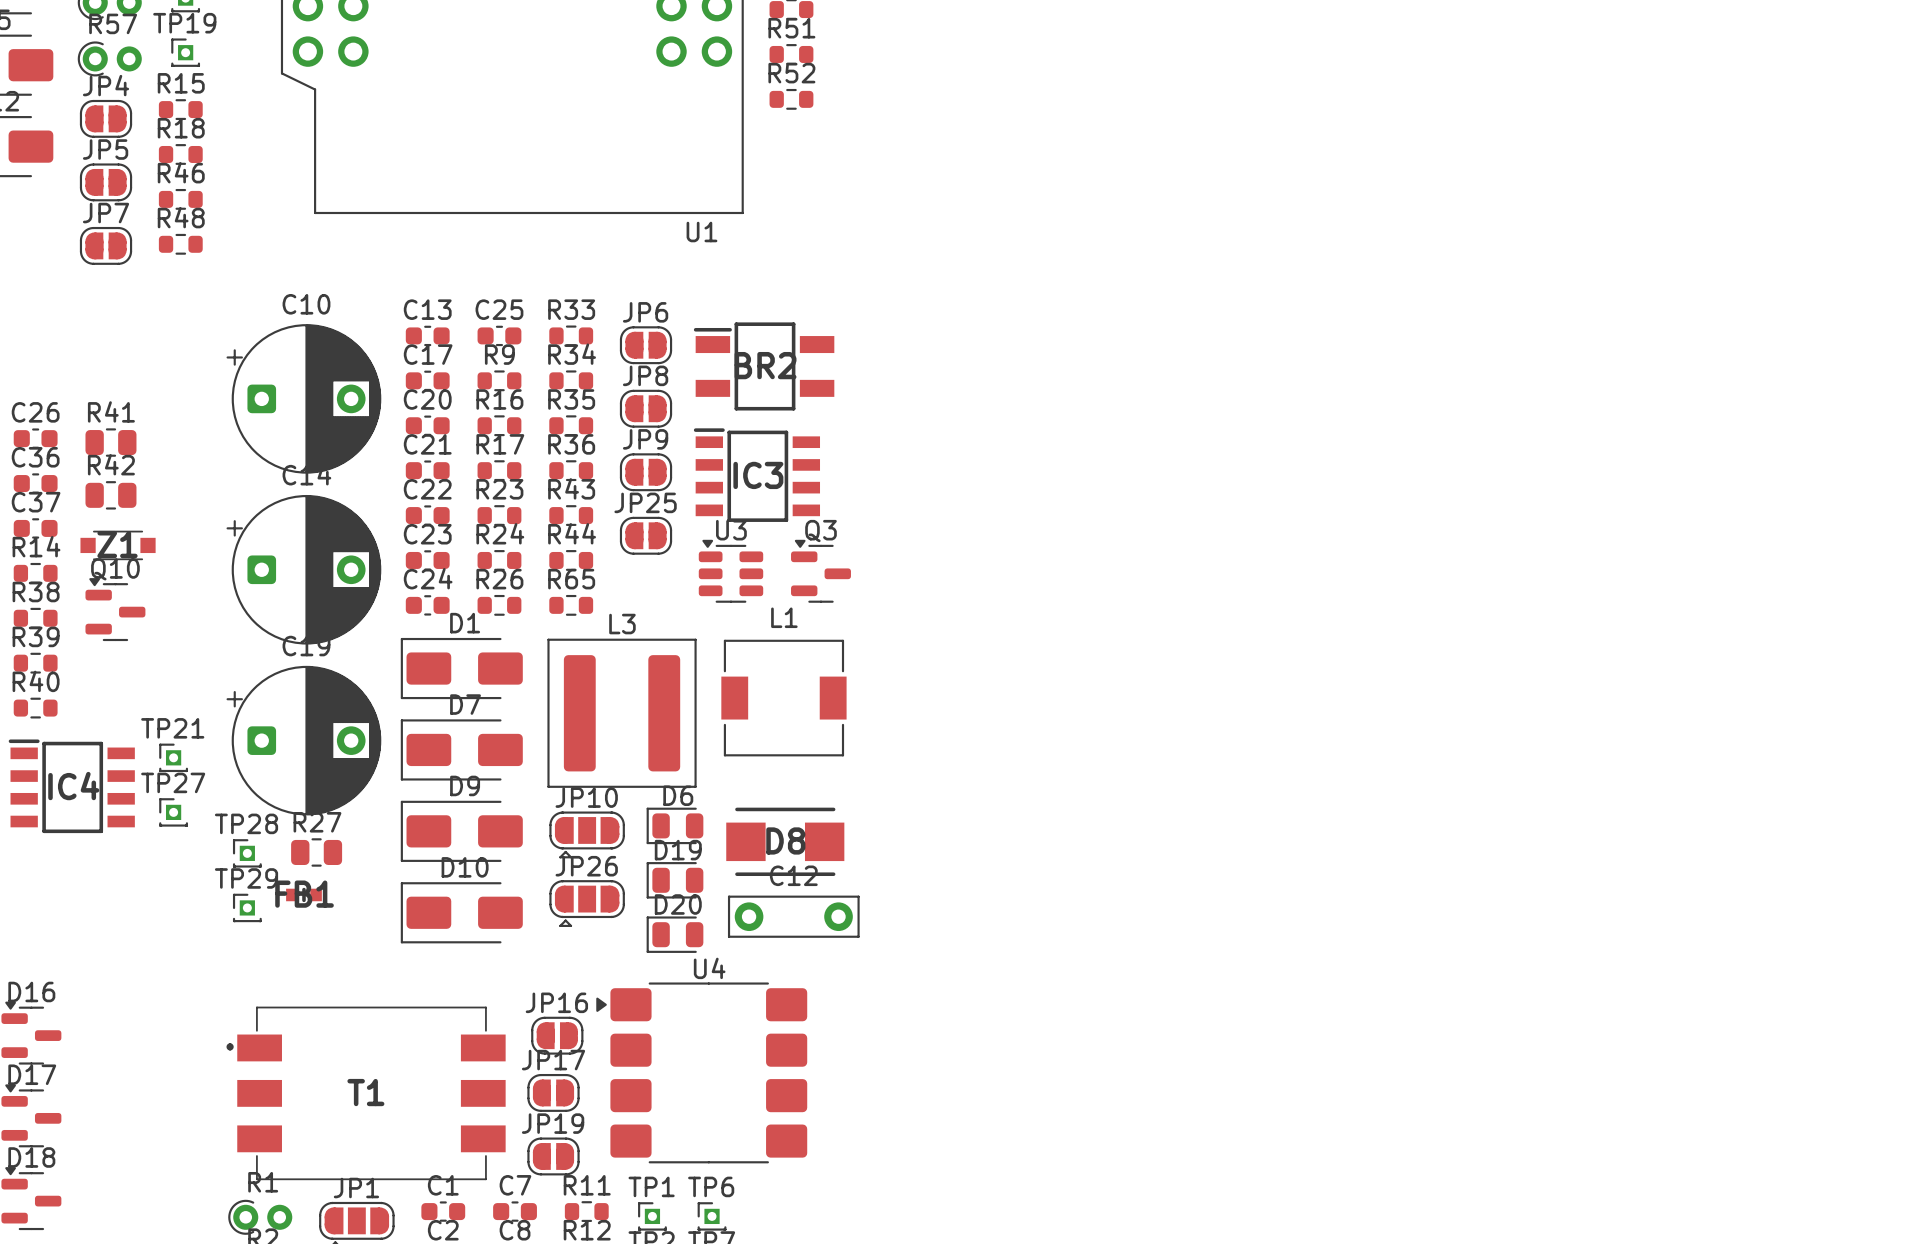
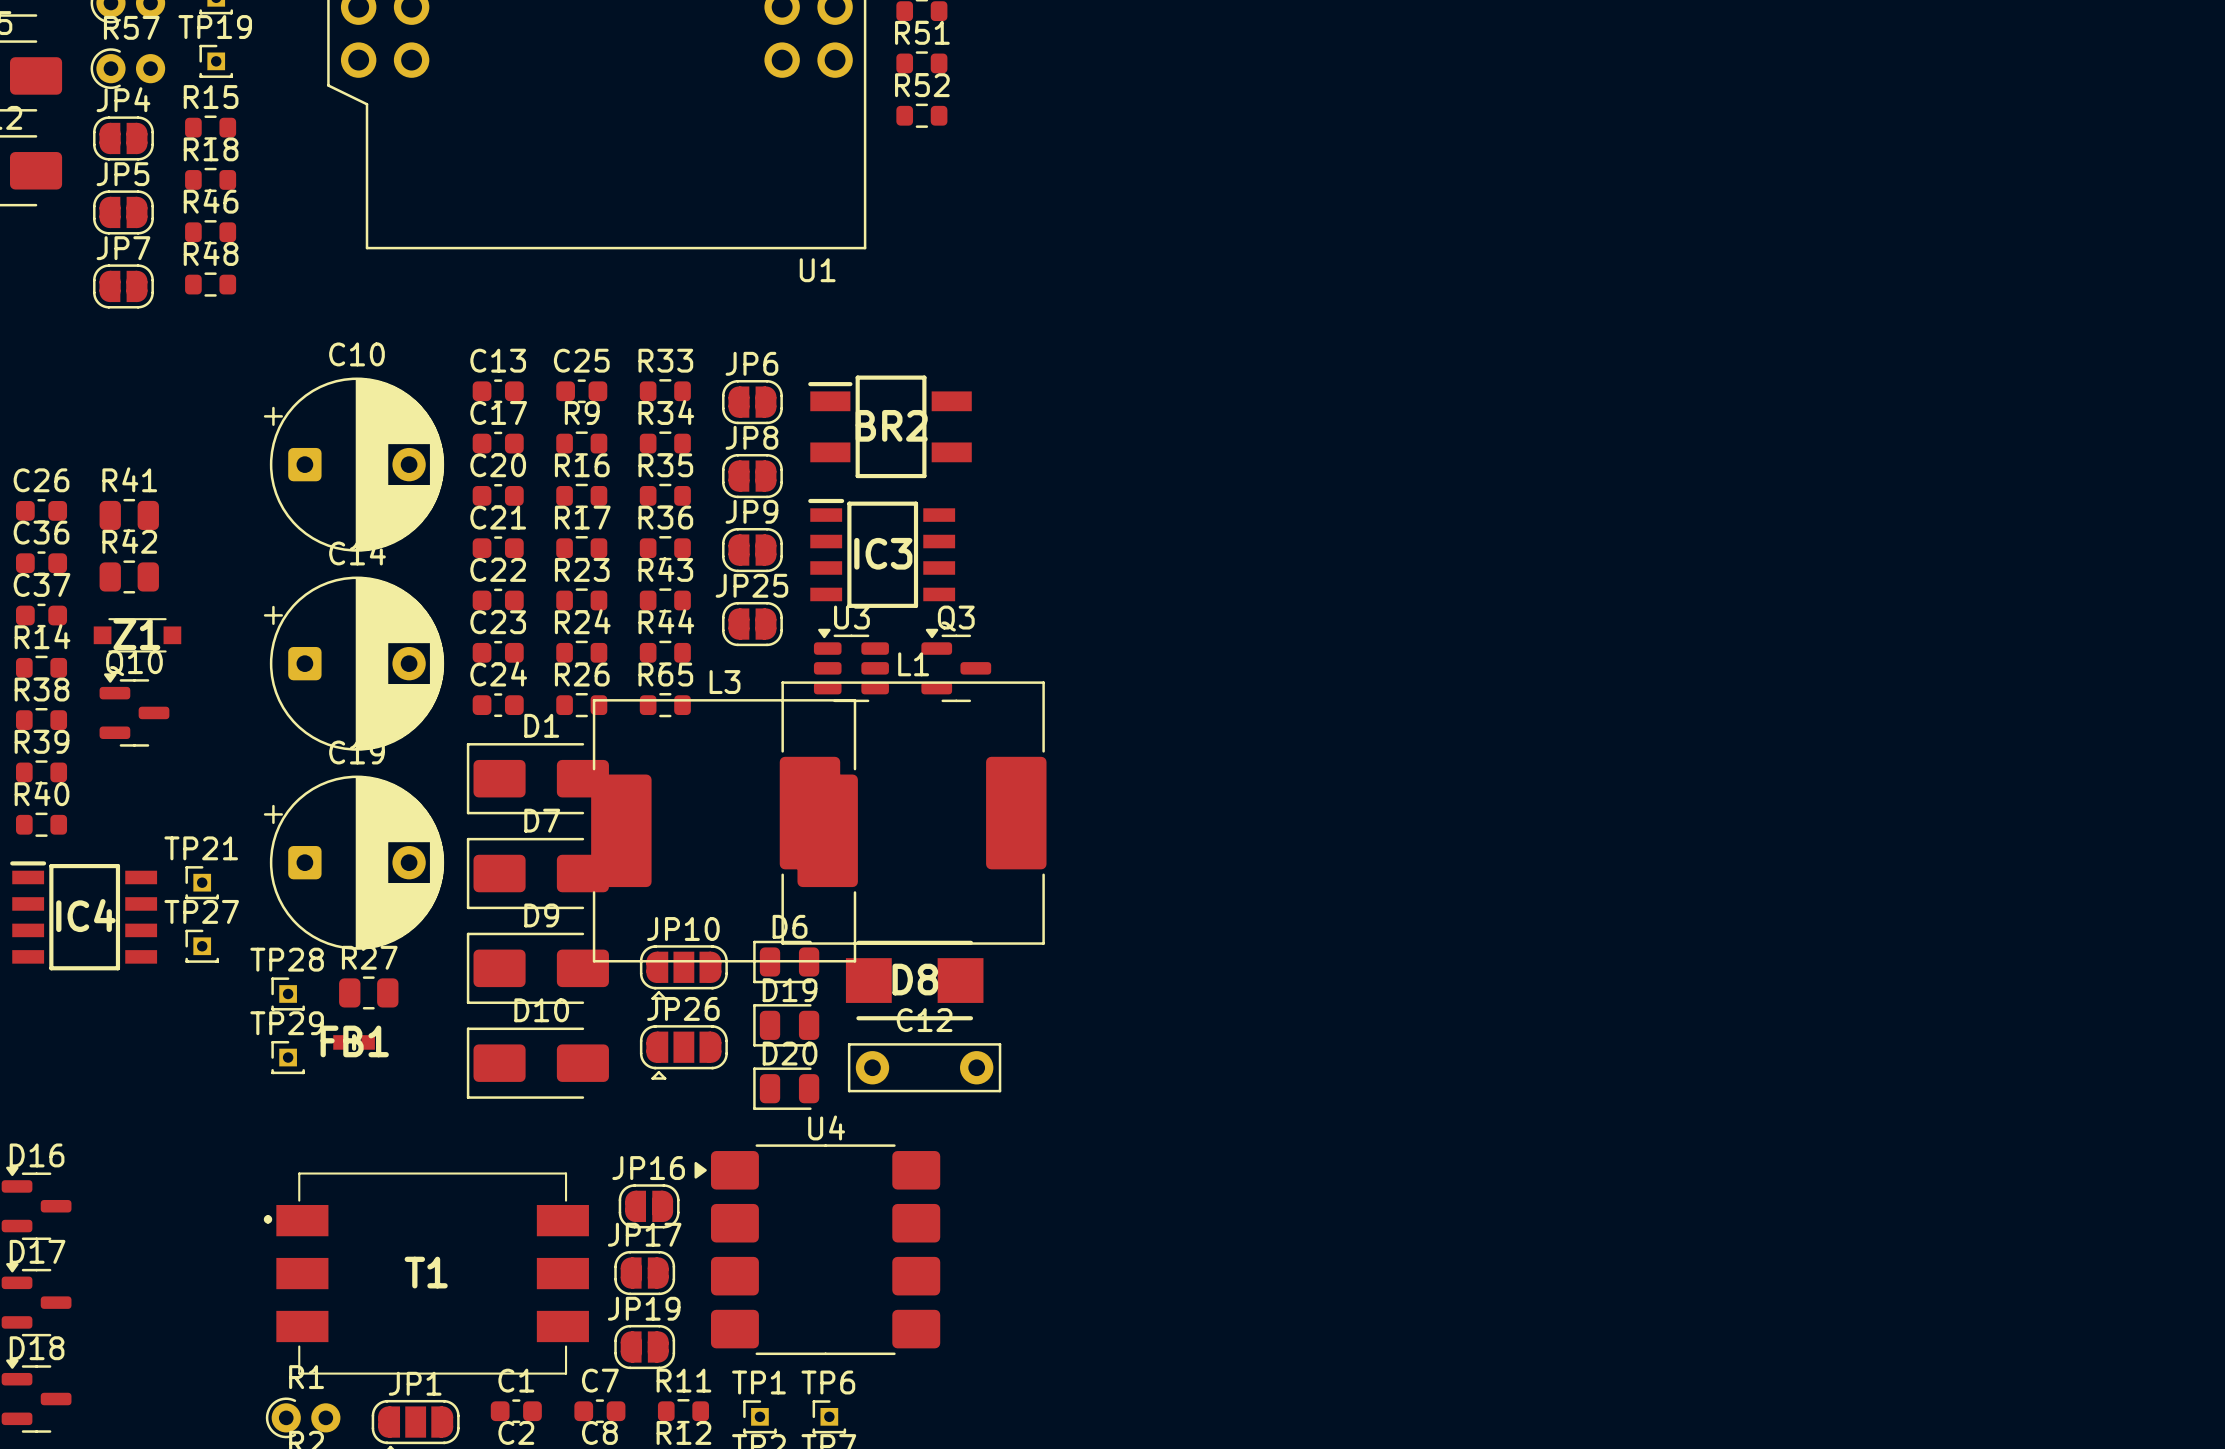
L1 name position: L1 (784, 617) -> L1 (913, 664)
L3 name position: L3 (622, 624) -> L3 (725, 682)
L3 footprint: [547, 638, 697, 788] -> [591, 699, 858, 963]
L1 footprint: [721, 639, 847, 757] -> [779, 681, 1047, 945]

